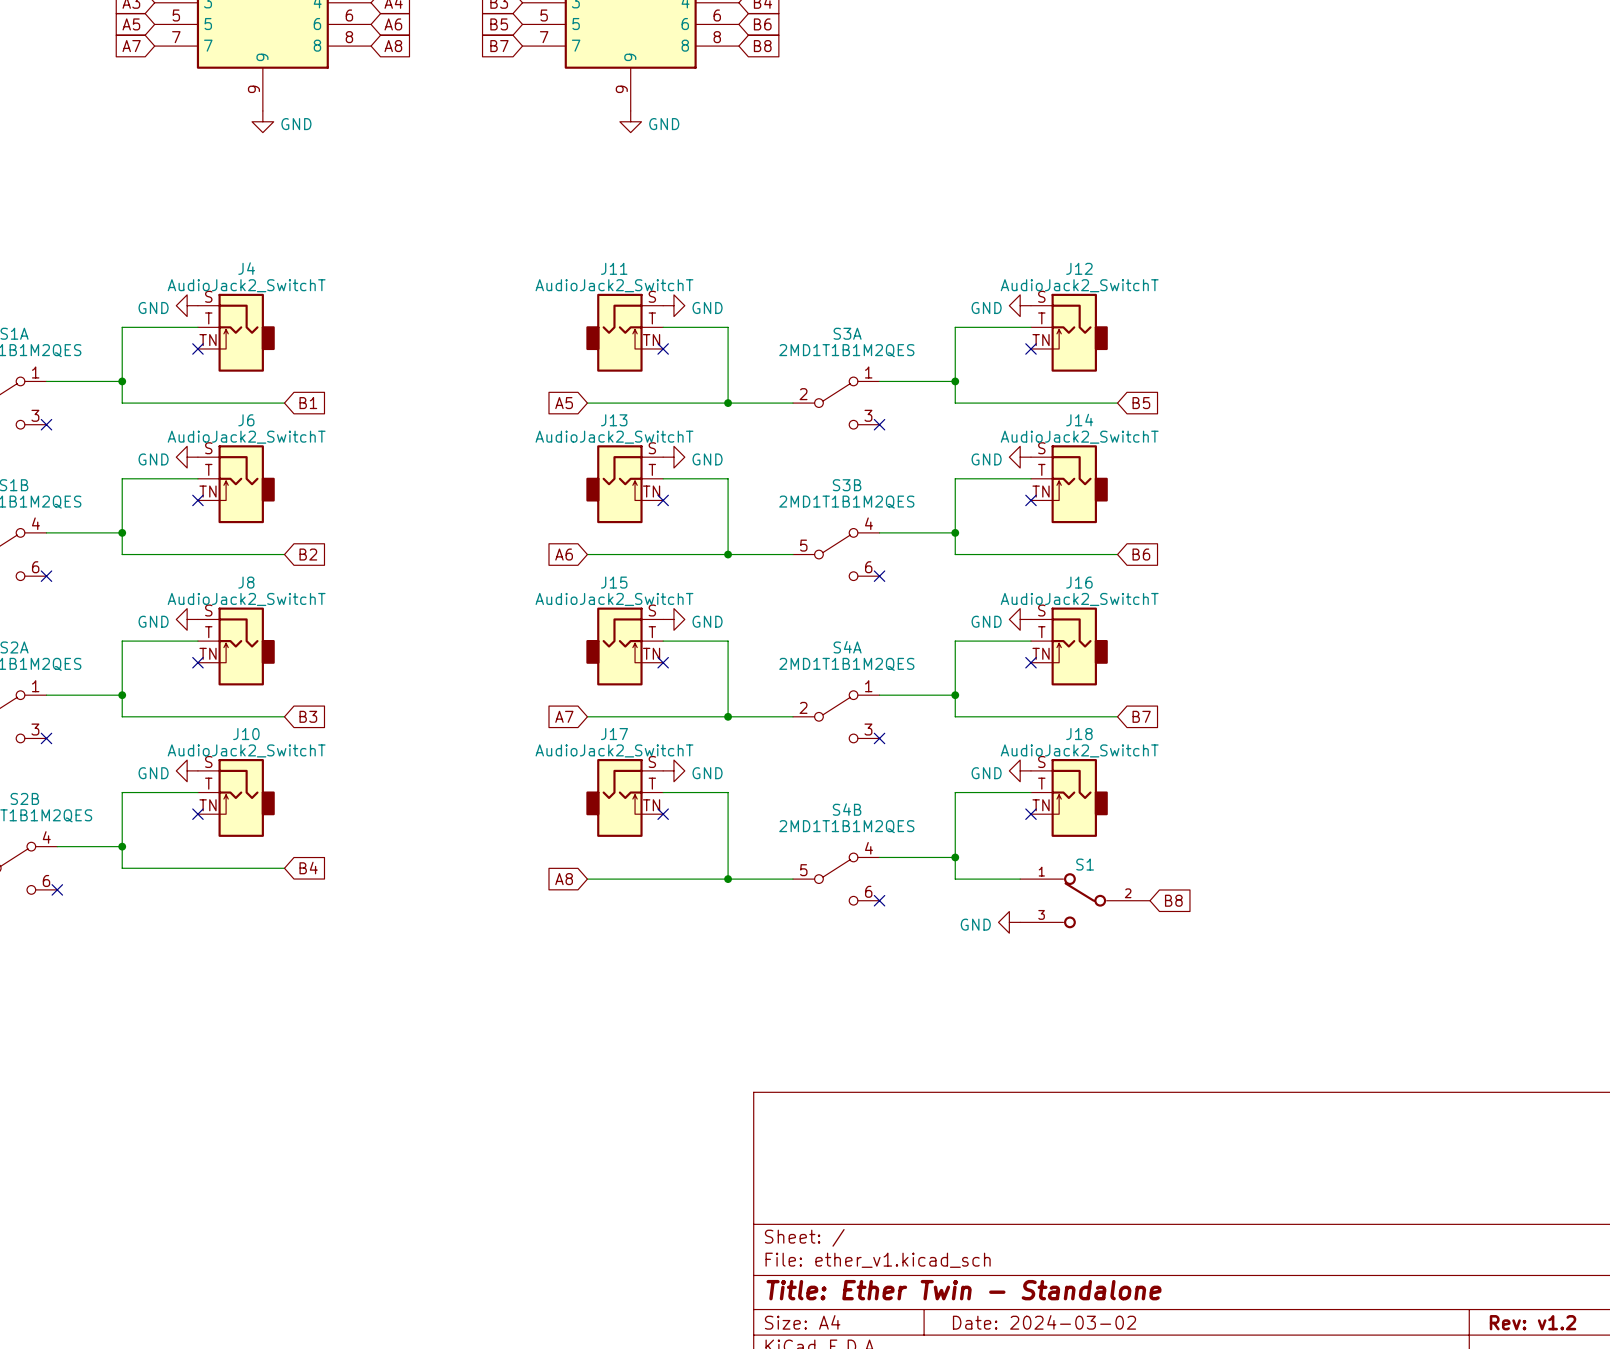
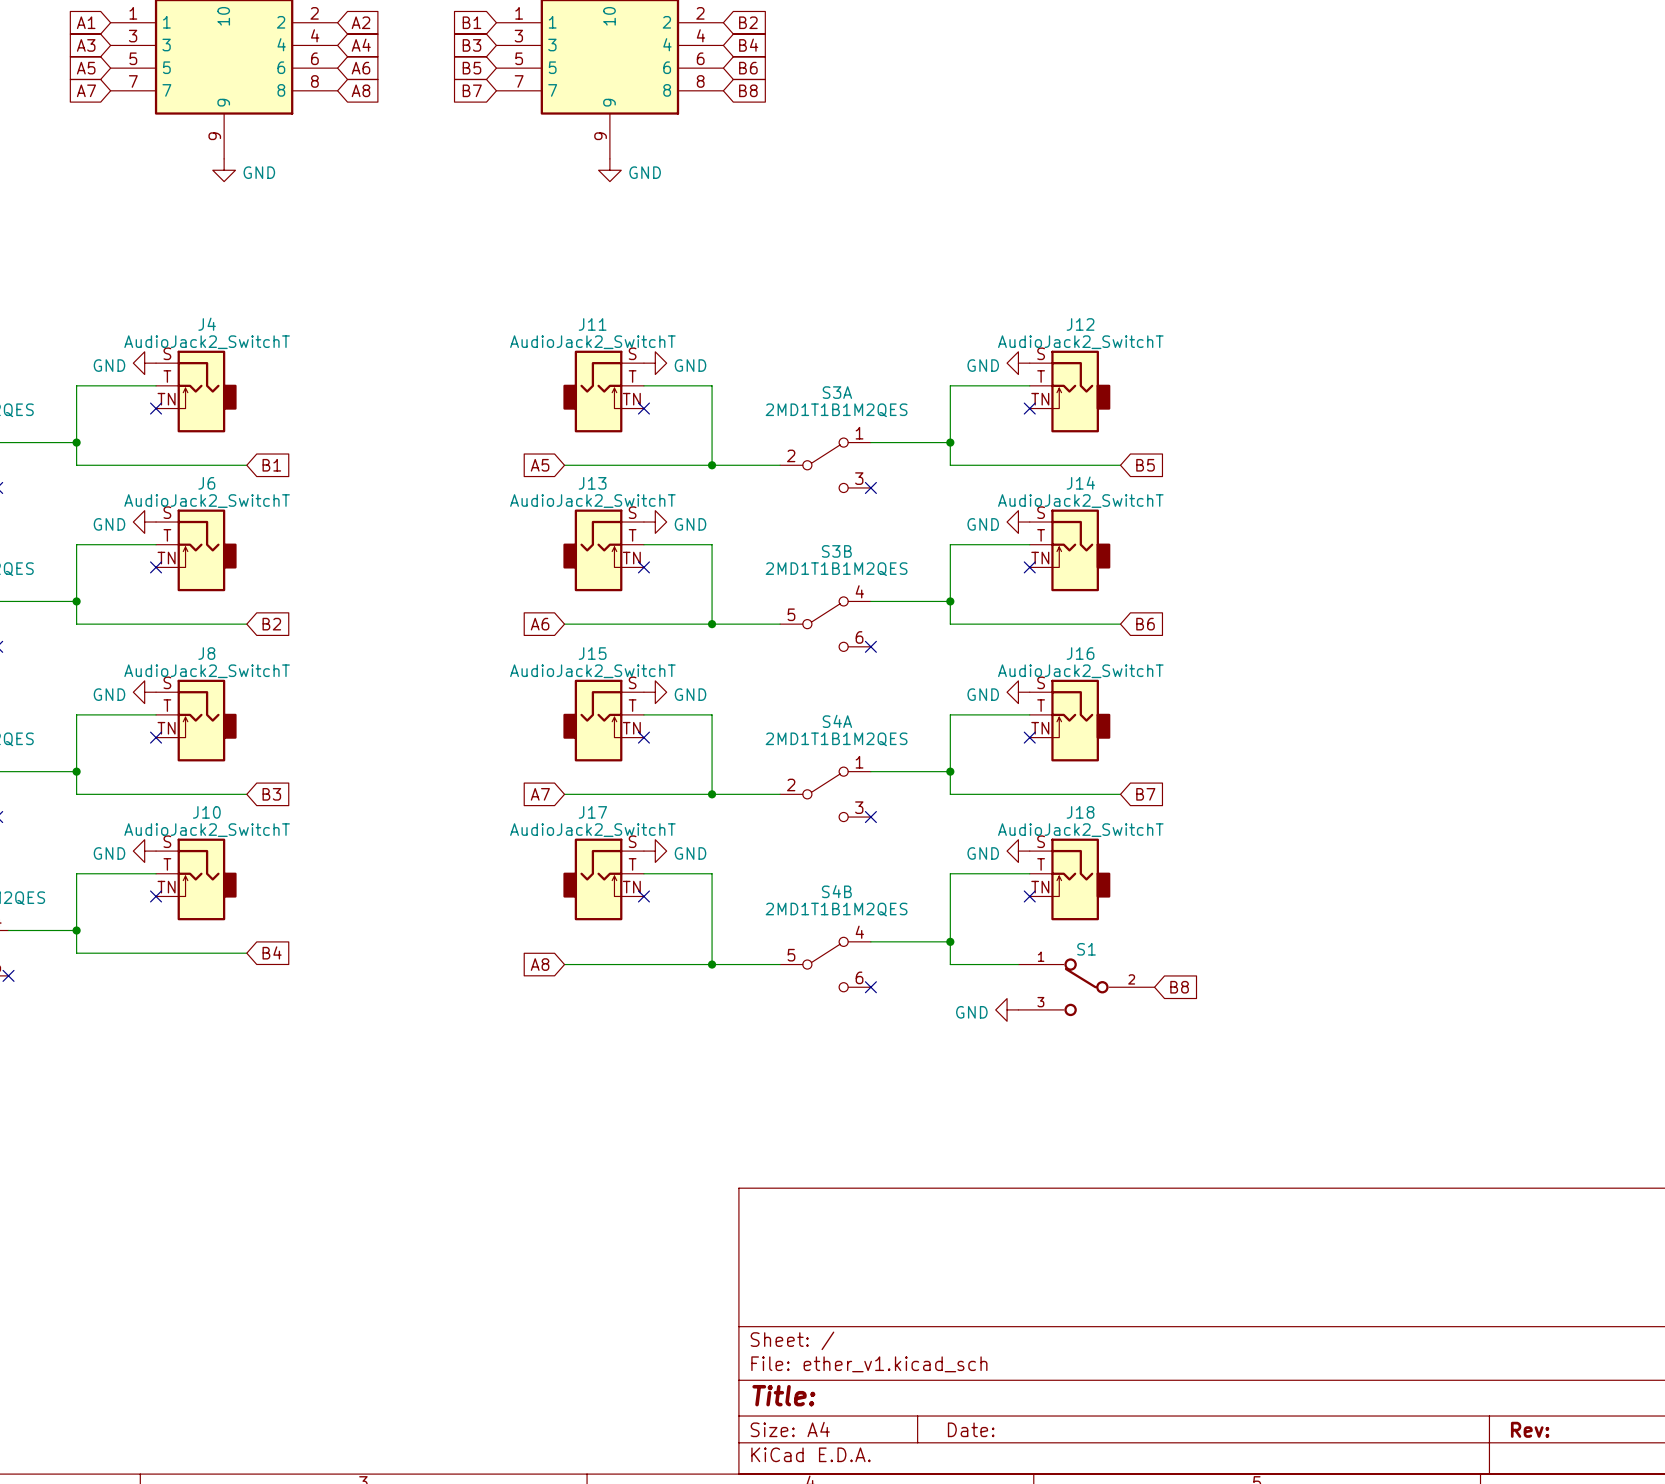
title block: Title: Ether Twin - Standalone (964, 1290) -> Title: (783, 1395)
title block: Date: 2024-03-02 (1044, 1322) -> Date: (971, 1429)
title block: Rev: v1.2 (1533, 1322) -> Rev: (1530, 1429)

